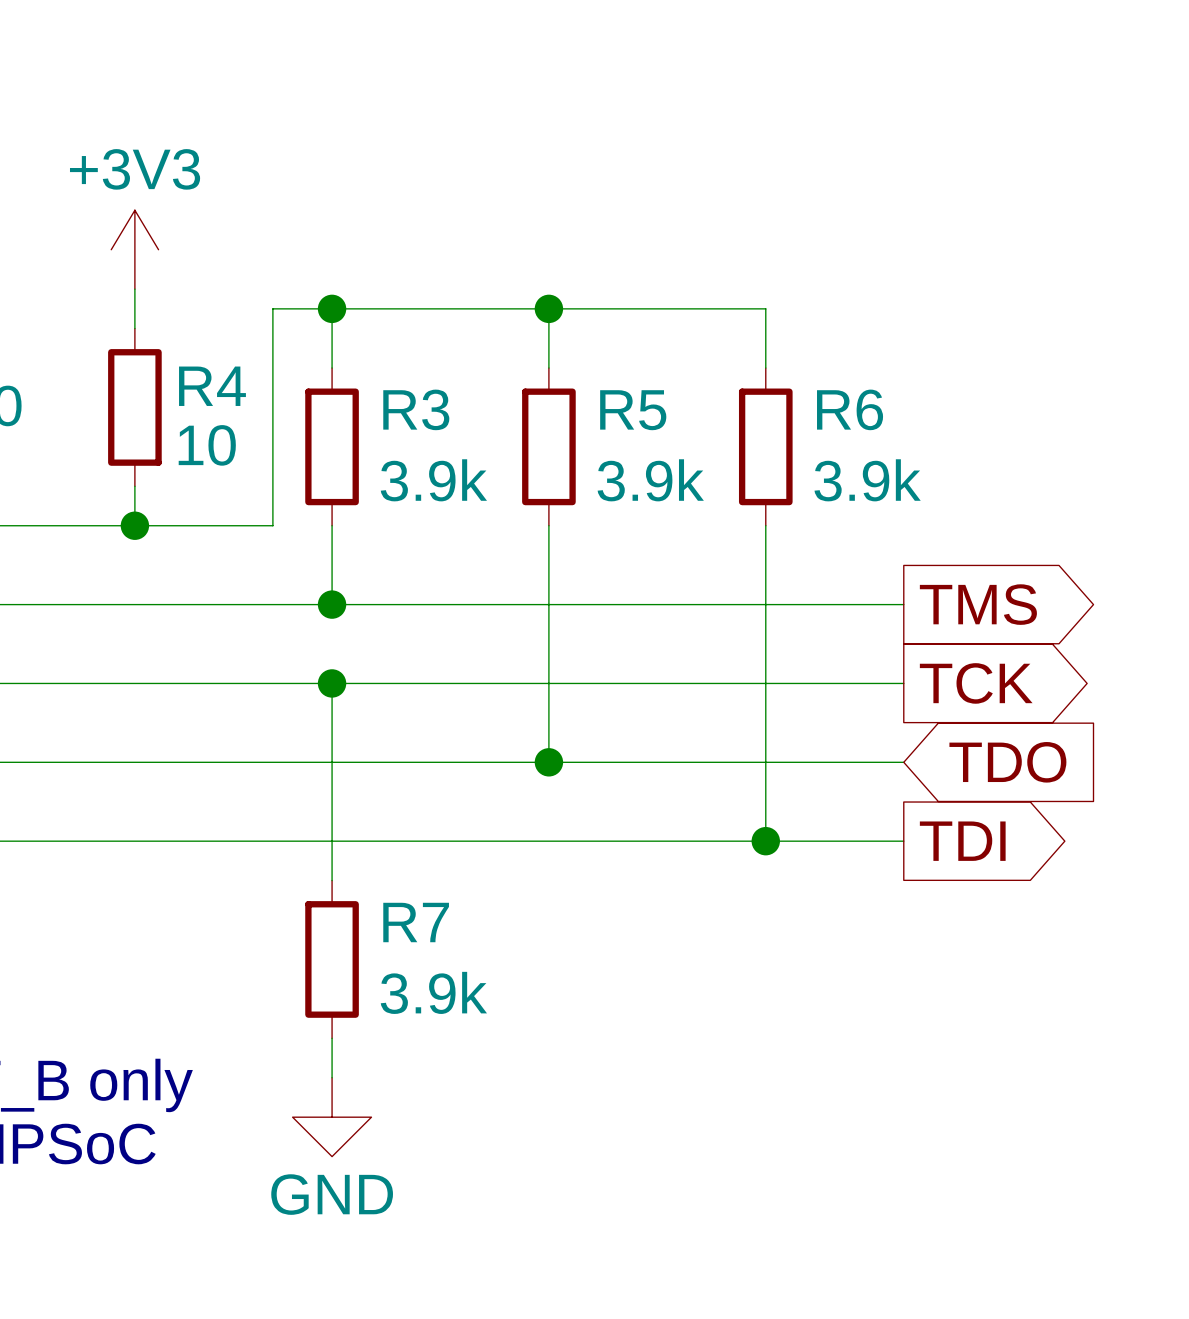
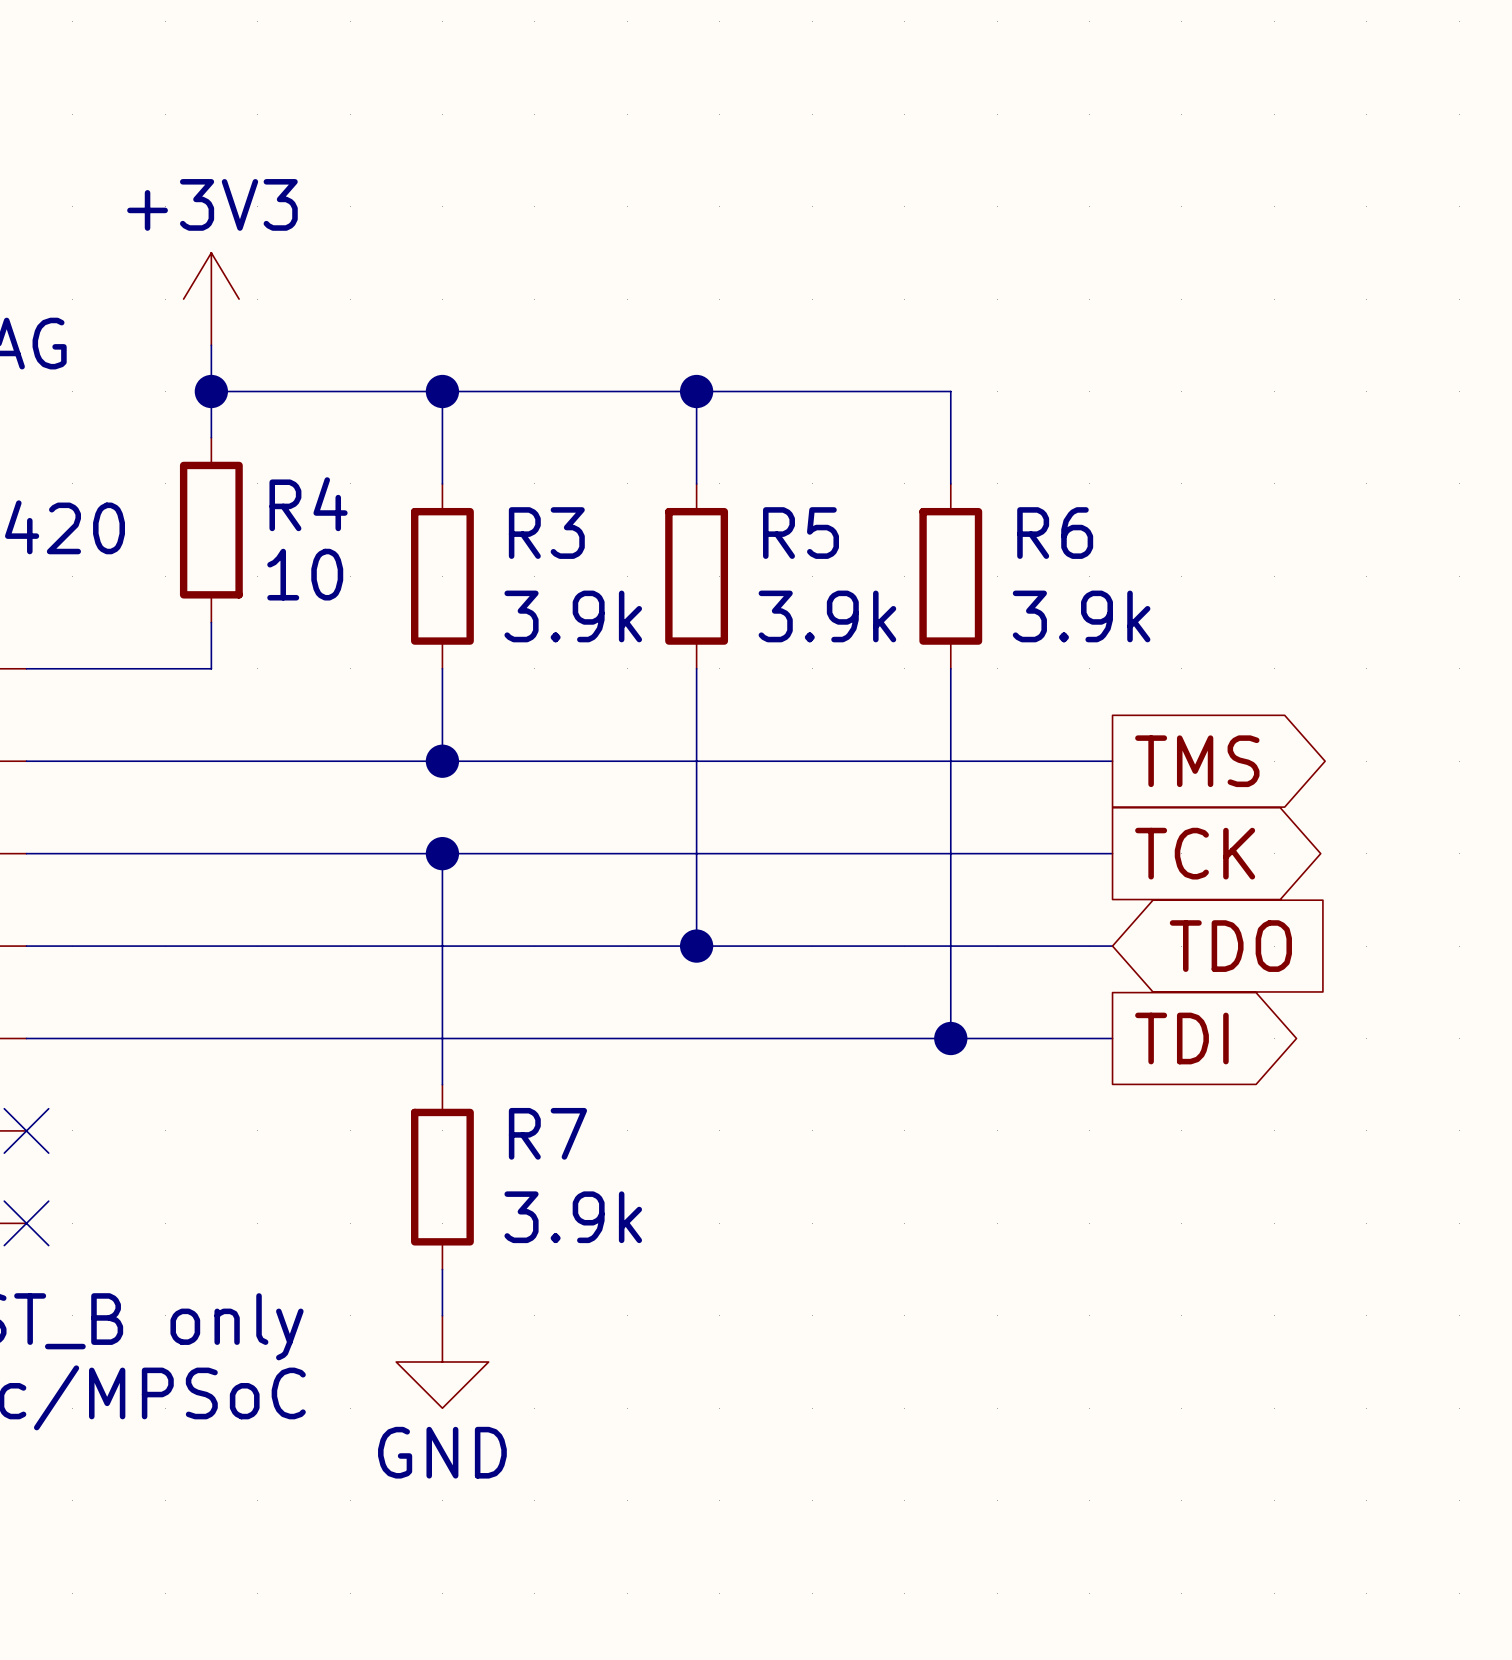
power symbol position: +3V3 (134, 249) -> +3V3 (211, 299)
junction: none -> (211, 391)
junction position: (332, 308) -> (442, 391)
junction position: (548, 308) -> (696, 391)
wire: (765, 308) (272, 308) (272, 525) (134, 525) -> (950, 414) (950, 391) (211, 391) (211, 345)
junction: (134, 525) -> none

